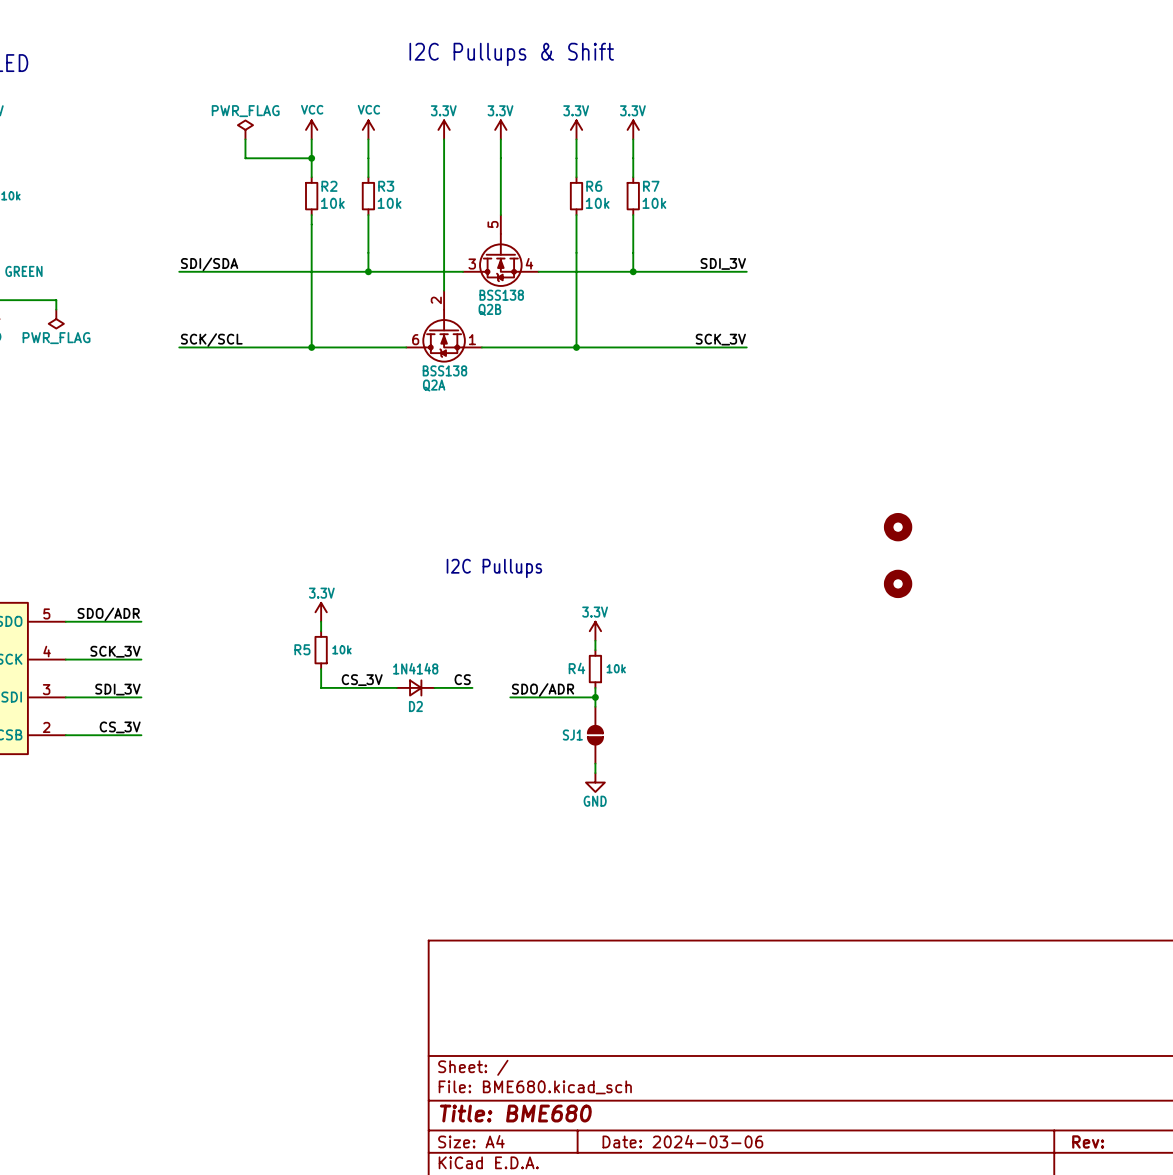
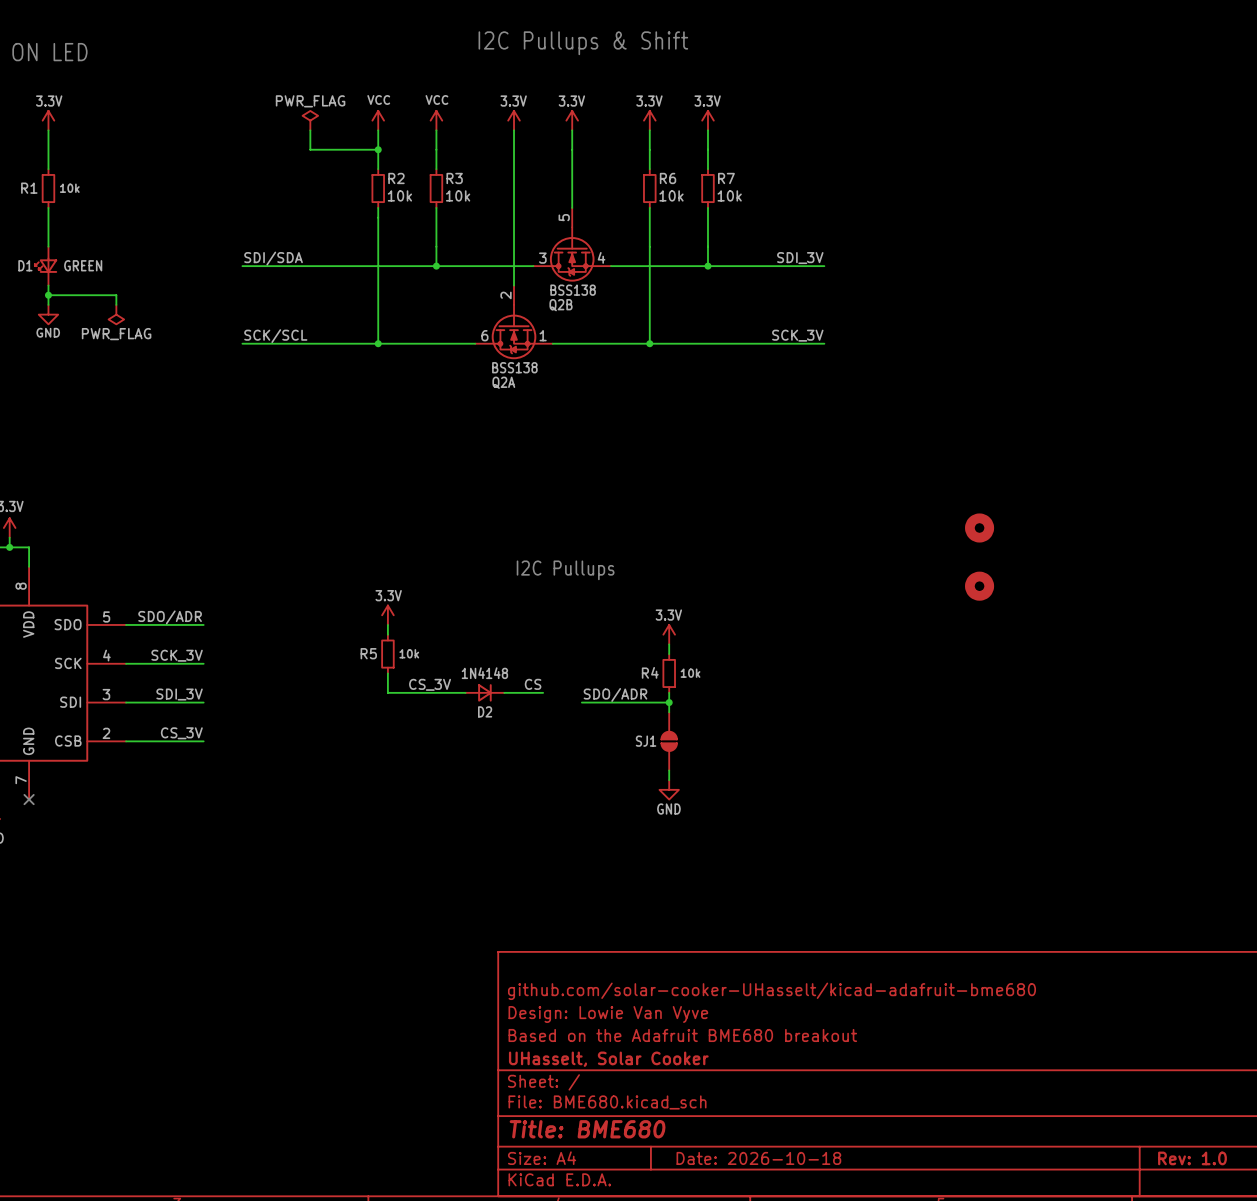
title block: none -> github.com/solar-cooker-UHasselt/kicad-adafruit-bme680 (771, 991)
title block: none -> Design: Lowie Van Vyve (608, 1014)
title block: none -> Based on the Adafruit BME680 breakout (682, 1035)
title block: none -> UHasselt, Solar Cooker (608, 1059)
title block: Date: 2024-03-06 (682, 1141) -> Date: 2026-10-18 (758, 1158)
title block: Rev: (1088, 1141) -> Rev: 1.0 (1192, 1158)

